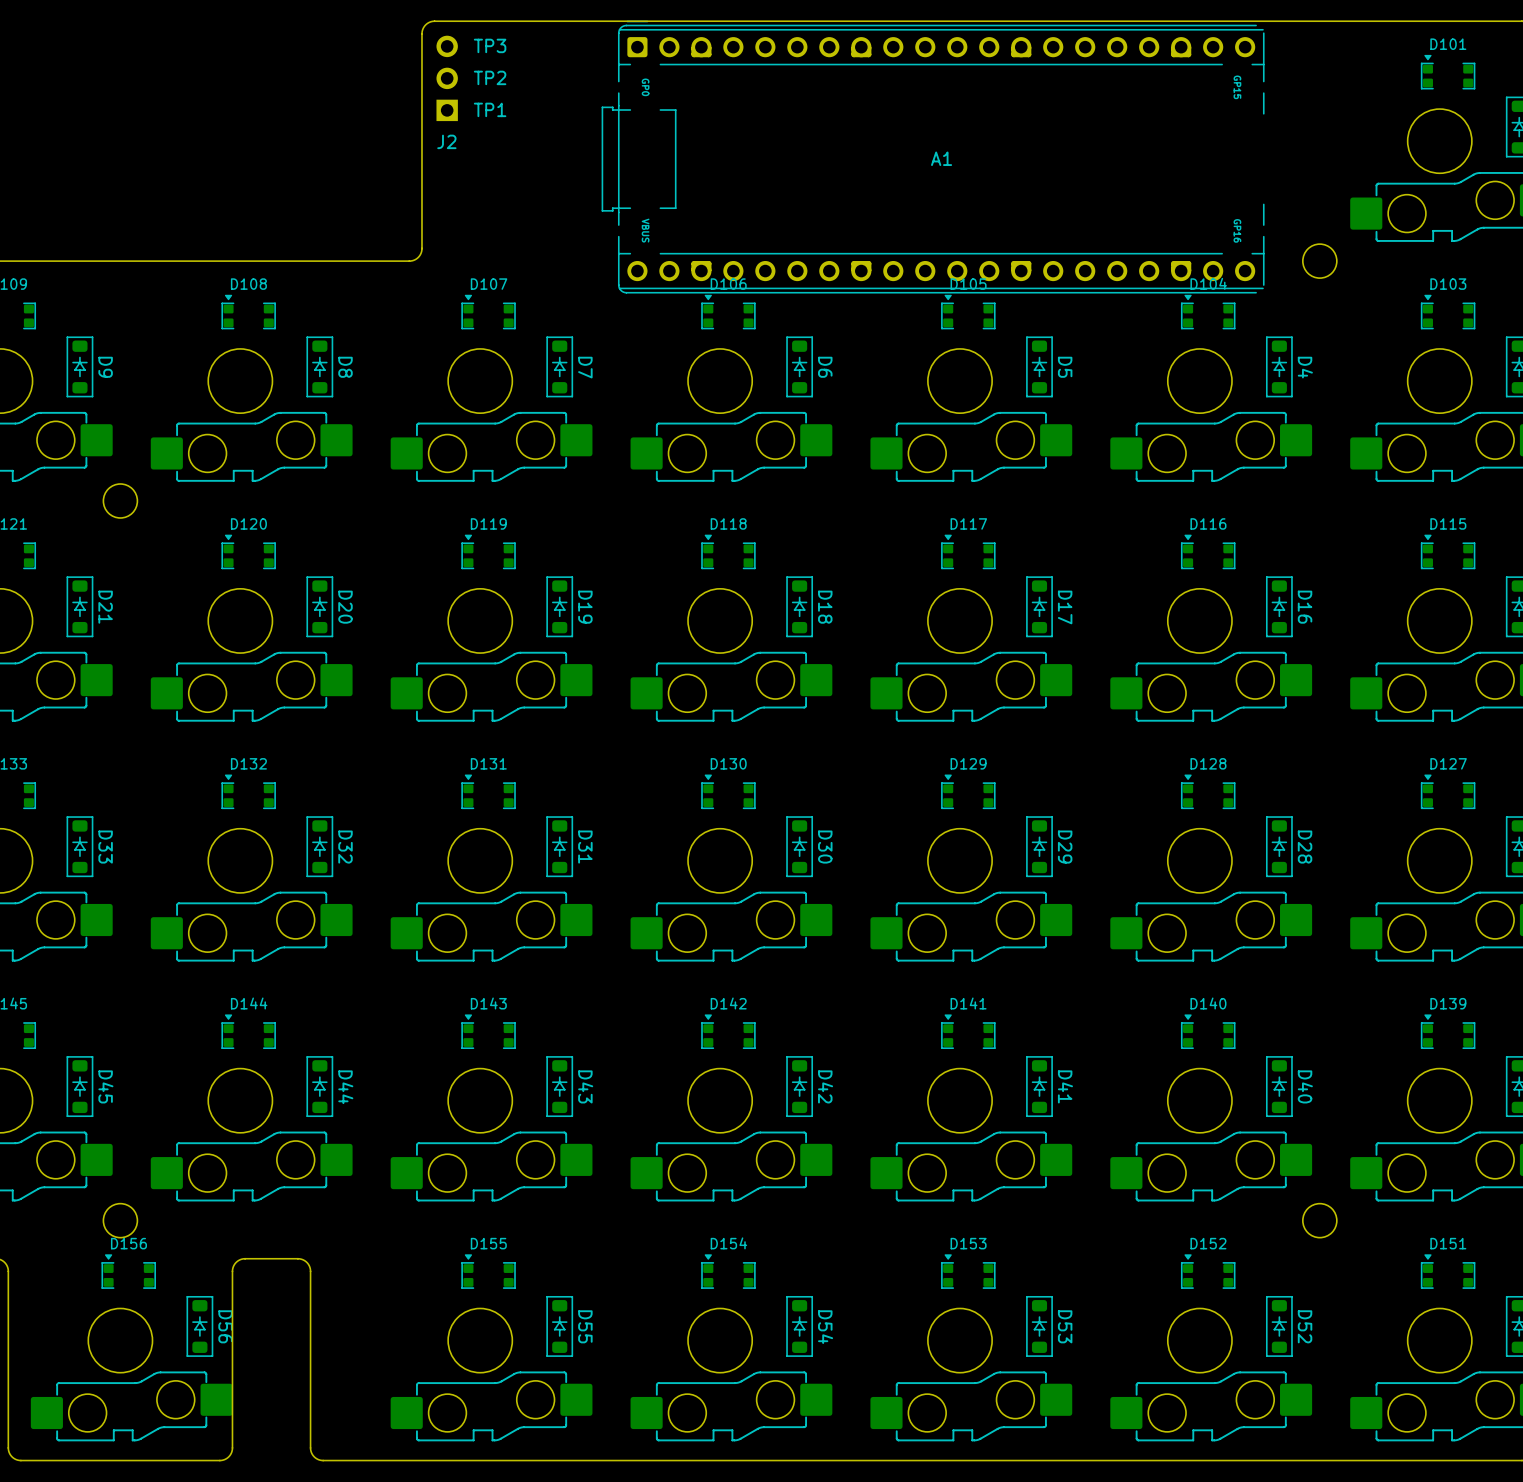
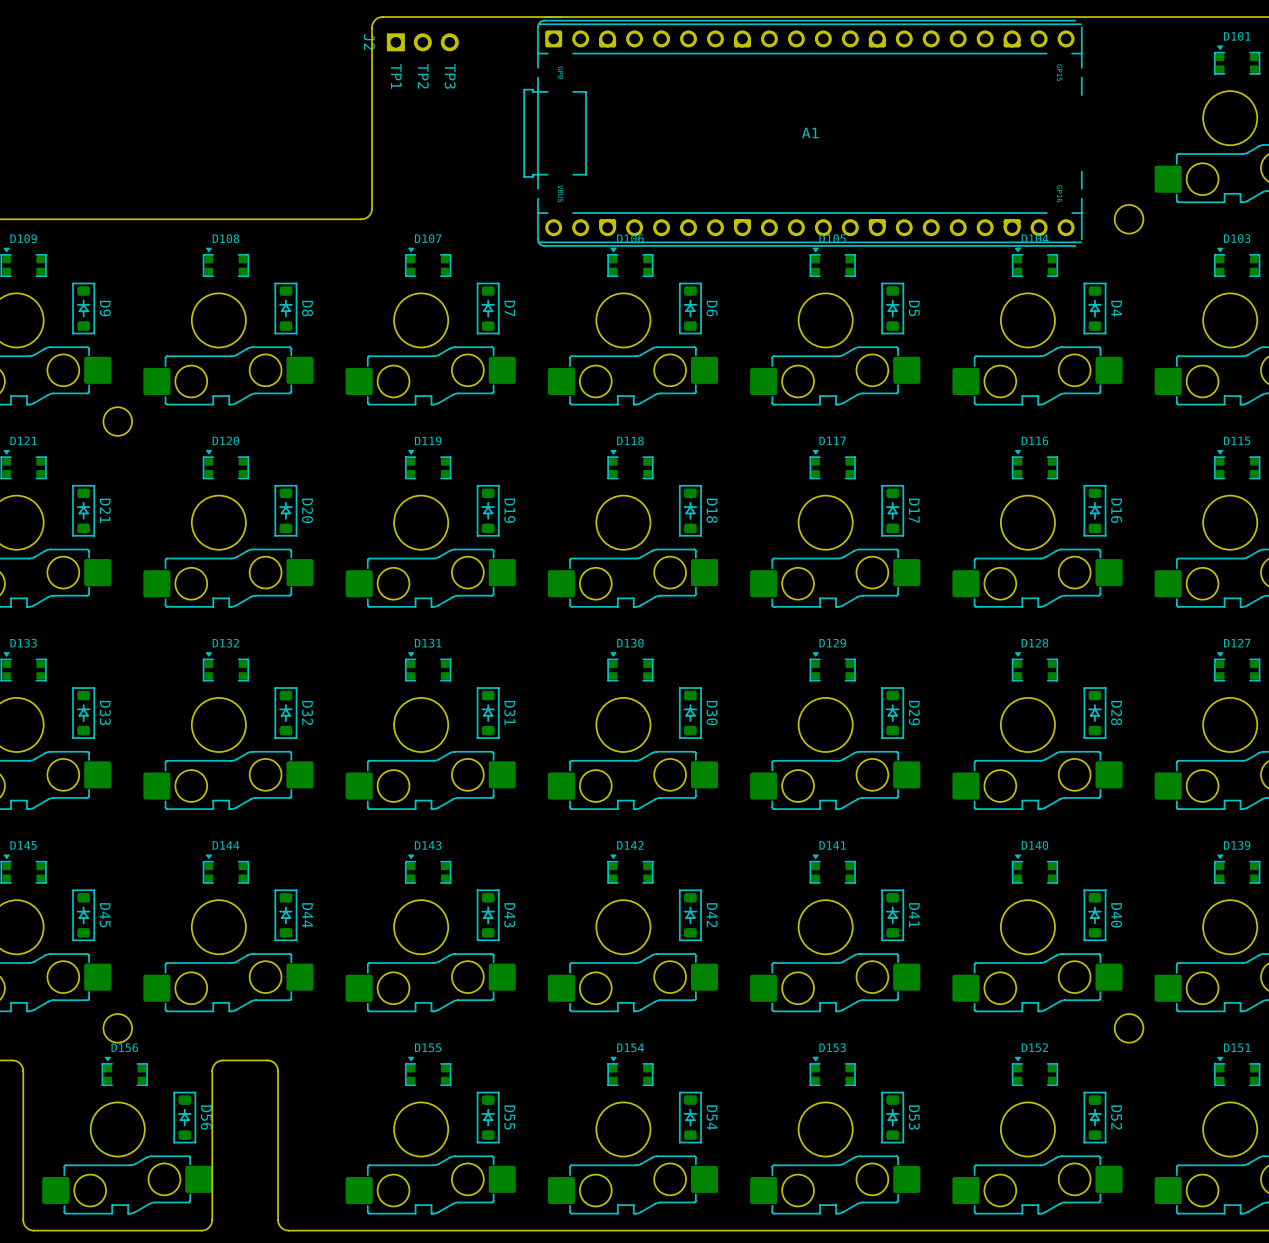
J2 rotation: 0° (447, 78) -> 90° clockwise (422, 42)

